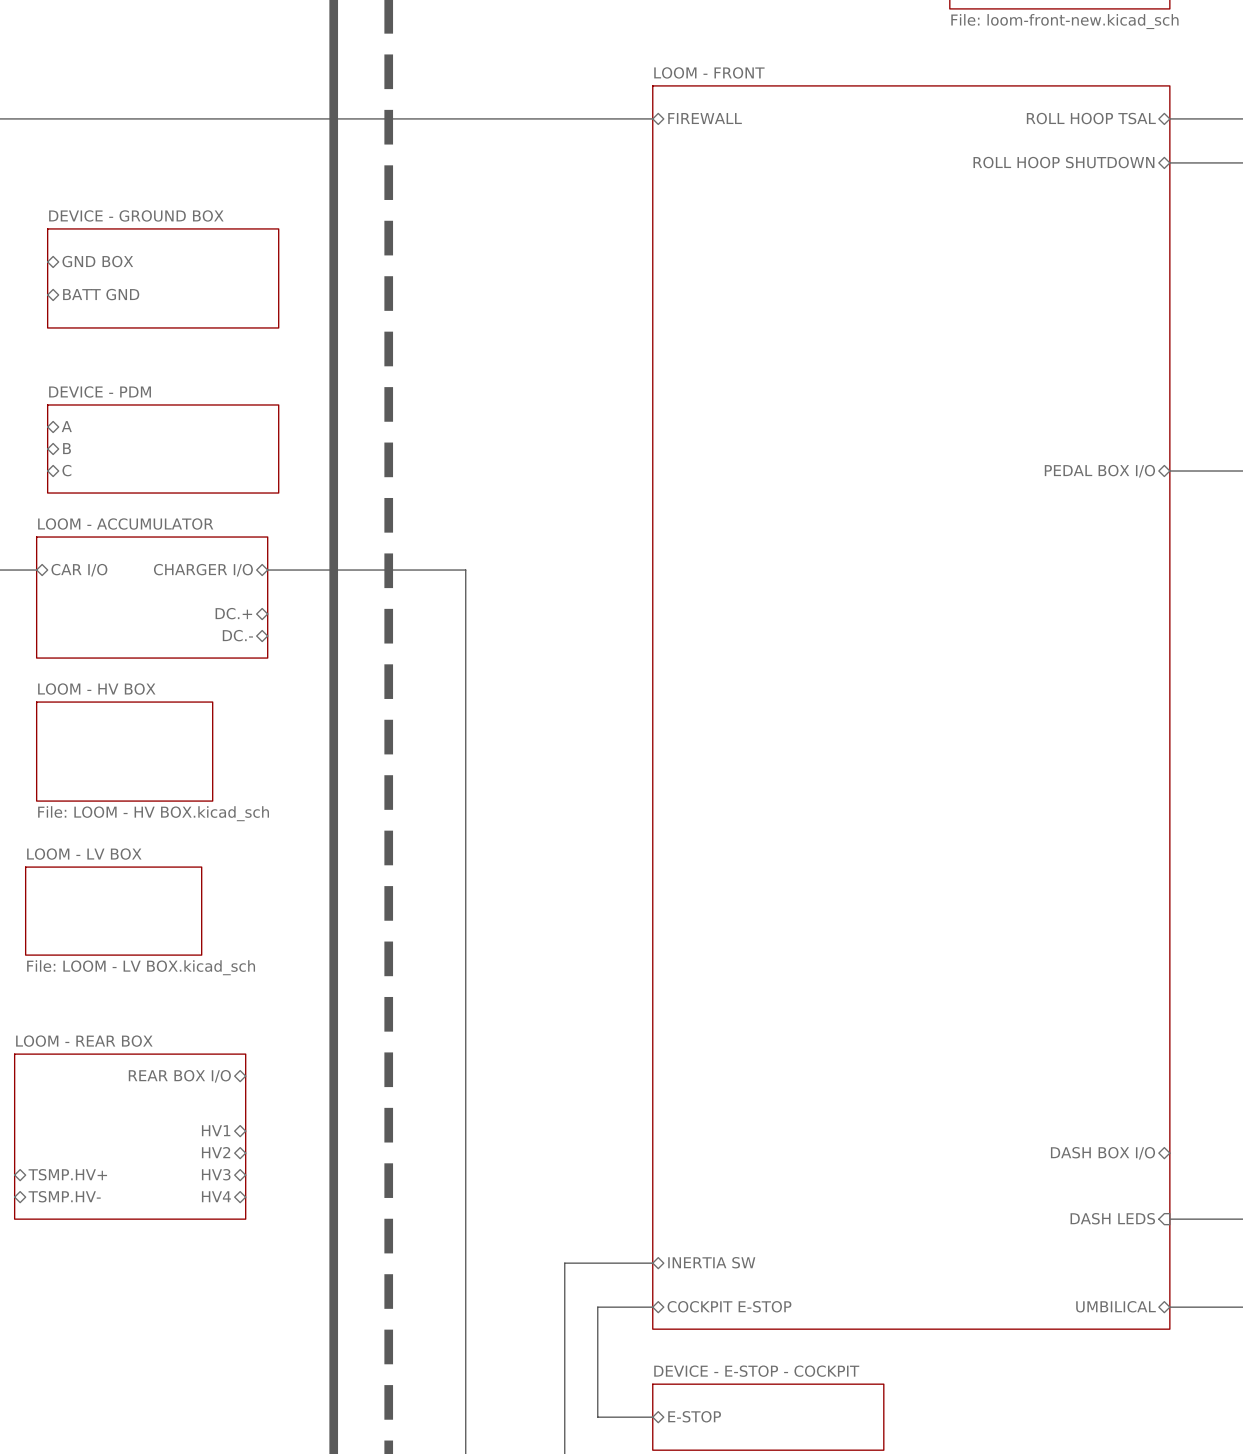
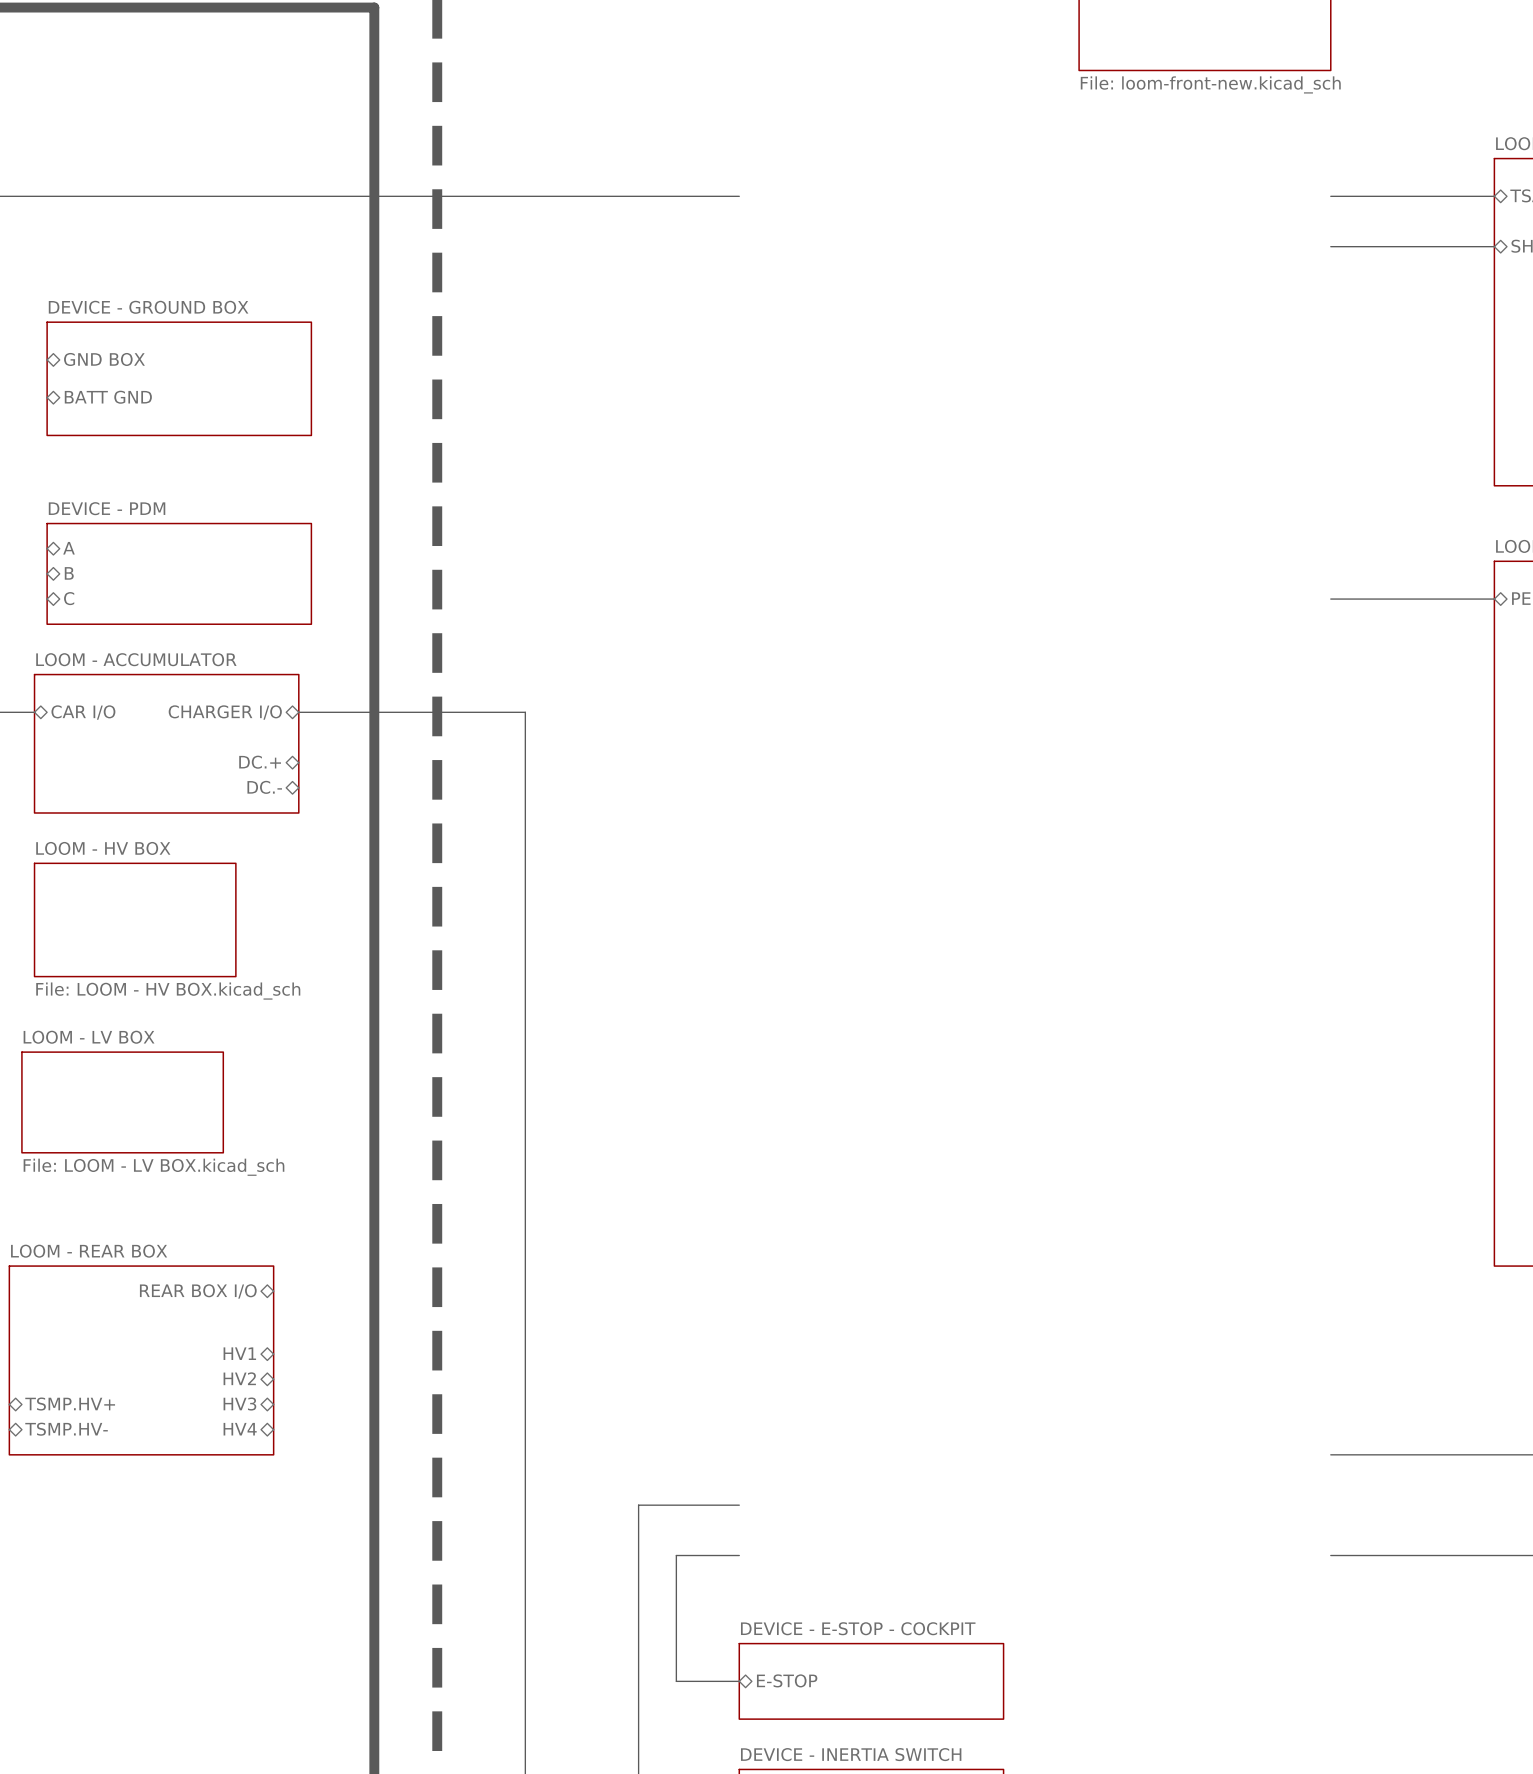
sheet pin: FIREWALL (705, 118) -> none
sheet pin: ROLL HOOP TSAL (1091, 118) -> none
sheet pin: ROLL HOOP SHUTDOWN (1063, 162) -> none
sheet pin: PEDAL BOX I/O (1099, 471) -> none
sheet LOOM - FRONT: (911, 707) -> none
sheet pin: DASH BOX I/O (1102, 1153) -> none
sheet pin: DASH LEDS (1112, 1218) -> none
sheet pin: INERTIA SW (711, 1262) -> none
sheet pin: COCKPIT E-STOP (729, 1306) -> none
sheet pin: UMBILICAL (1116, 1306) -> none

